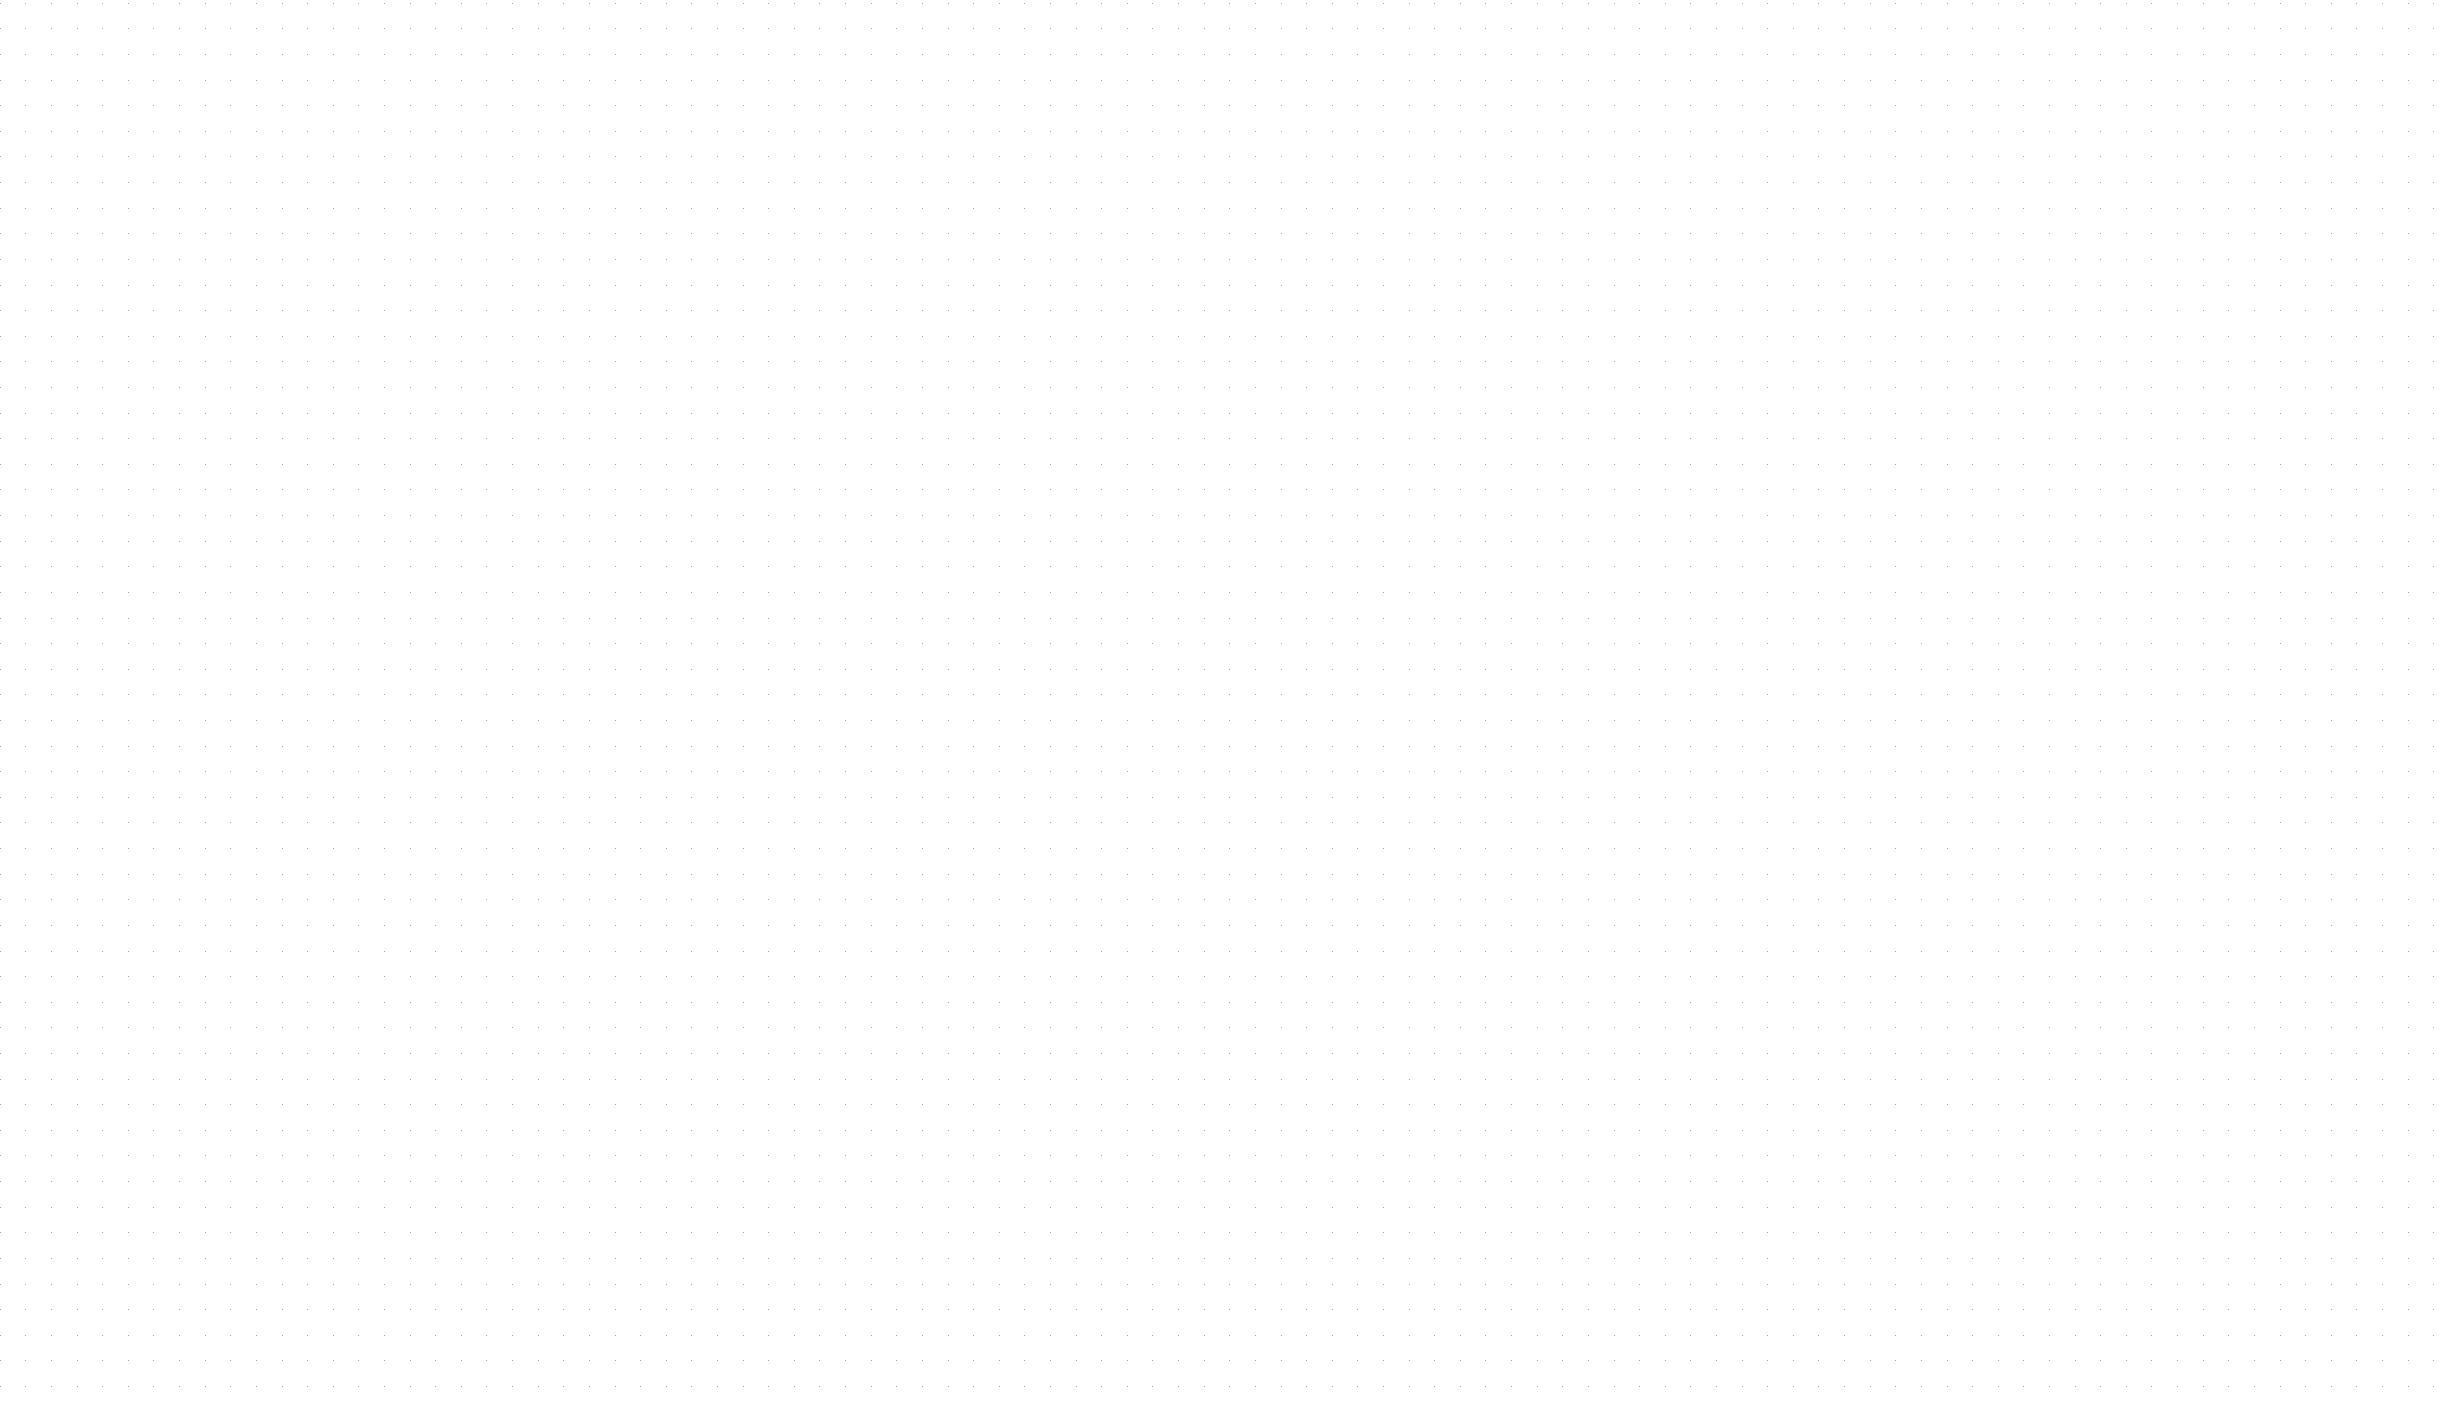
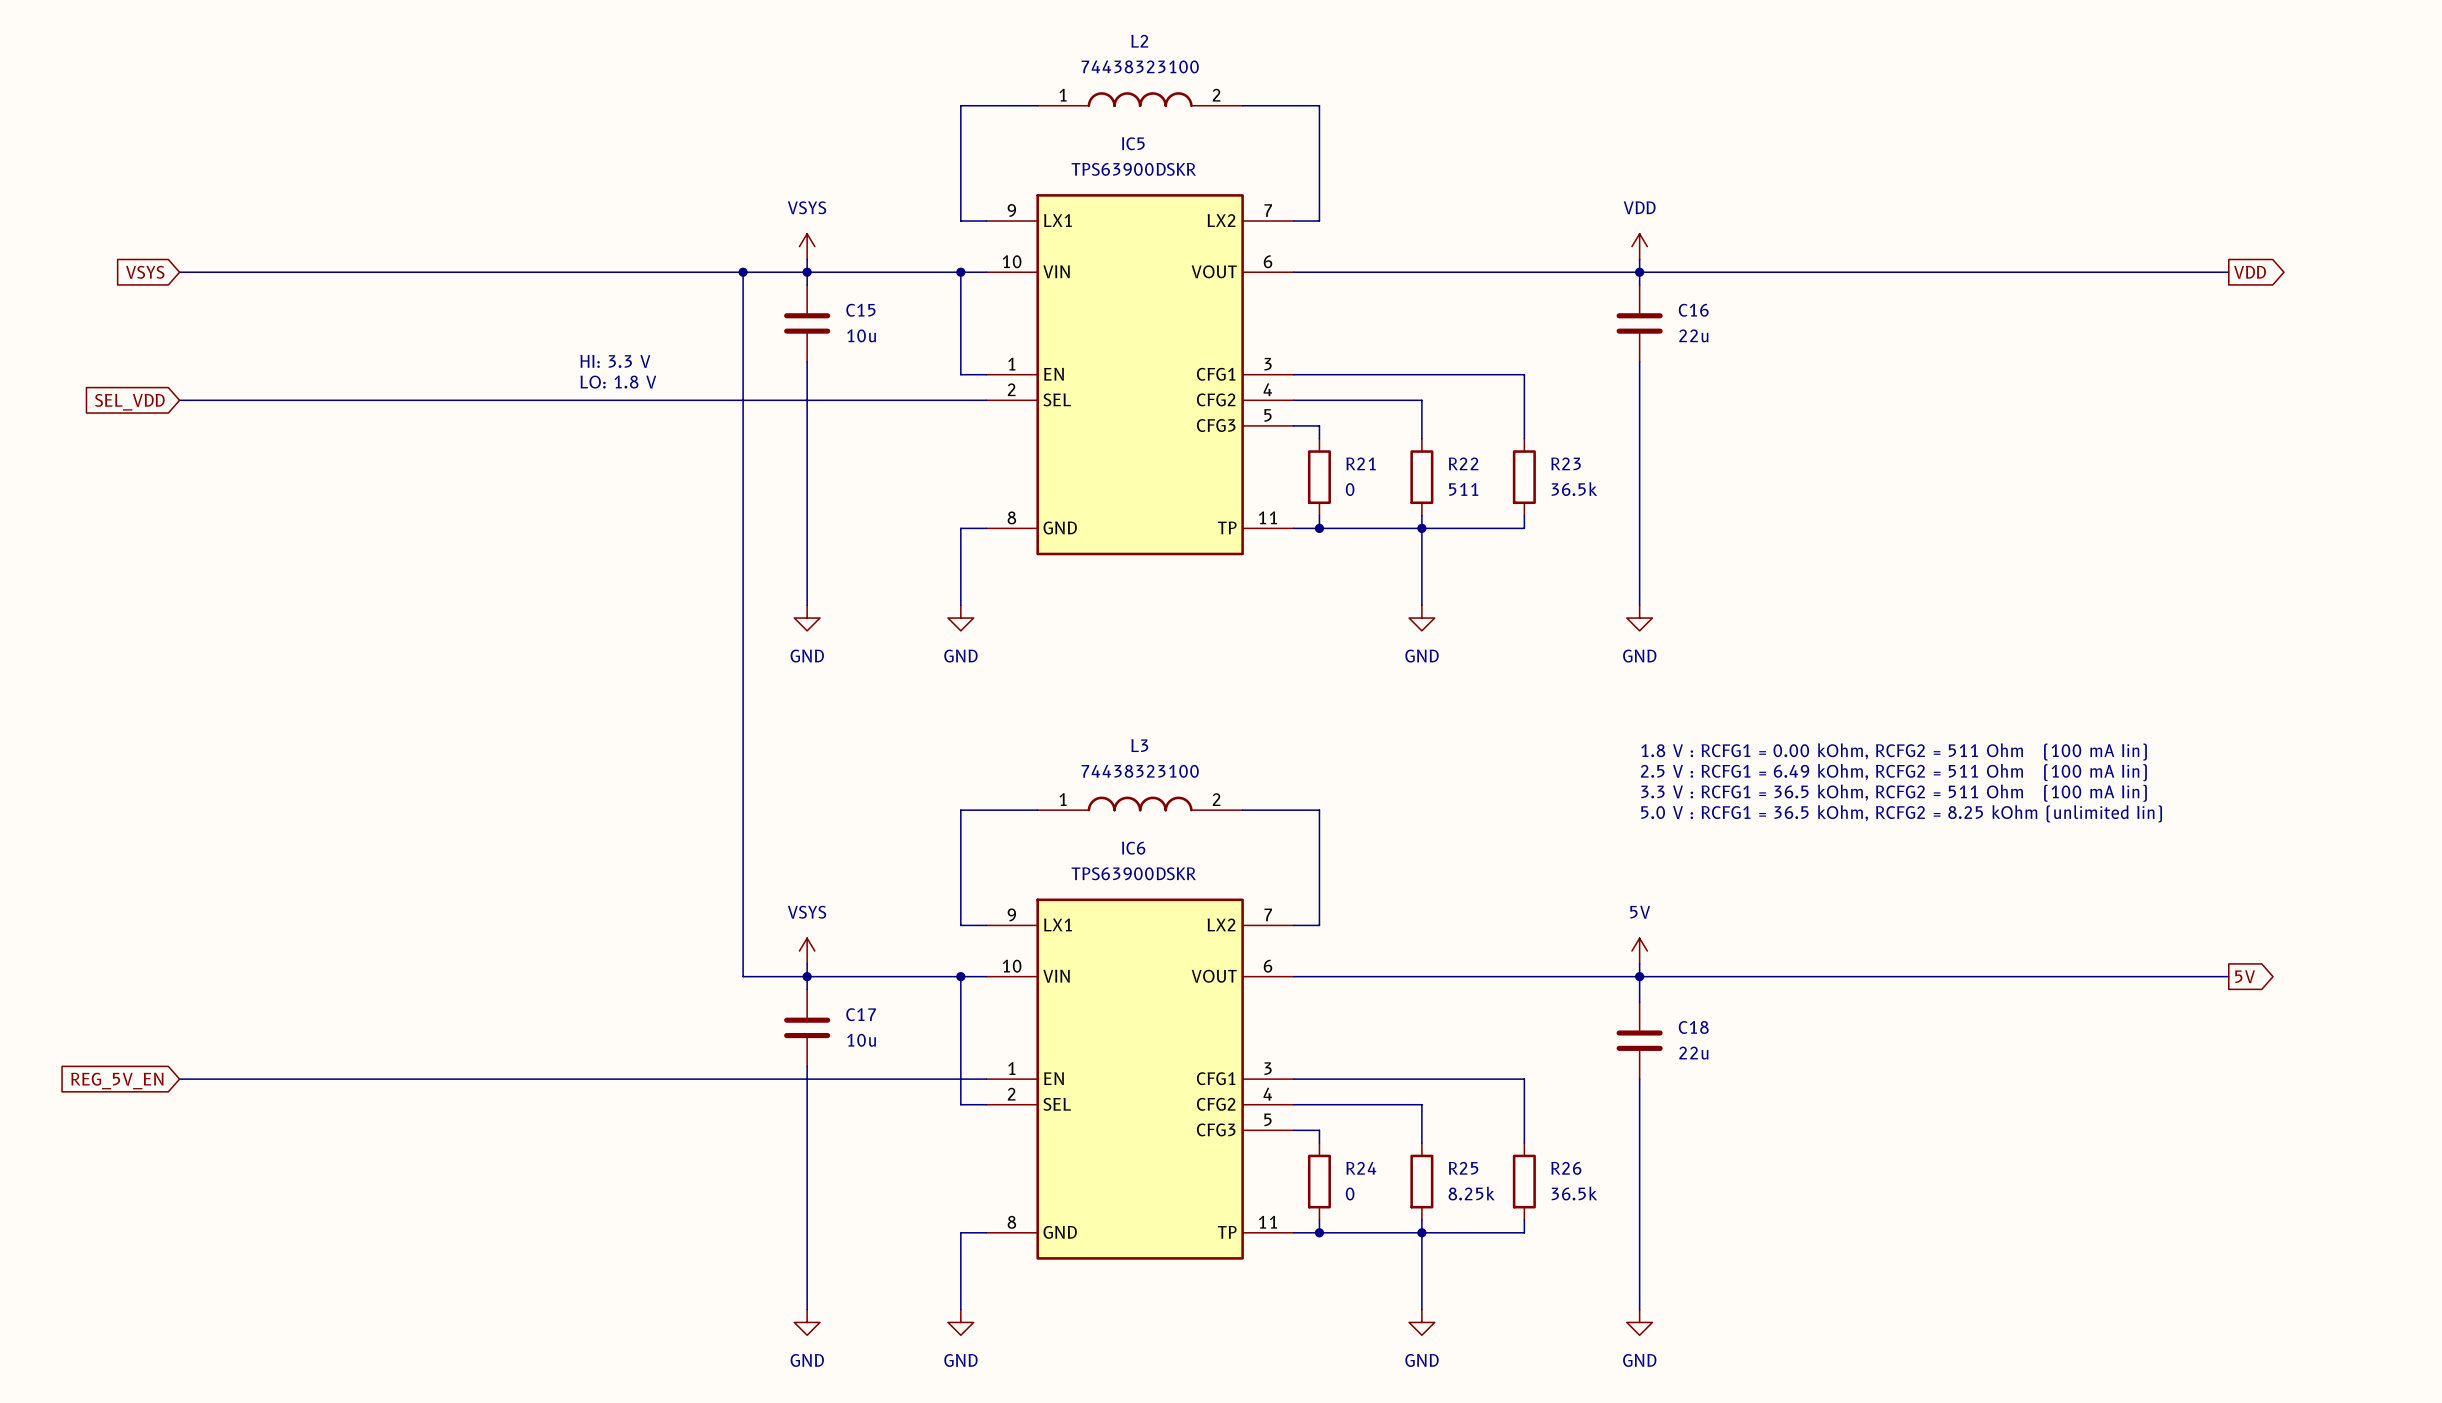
L2: none -> 74438323100 (1140, 99)
wire: none -> (1037, 105) (960, 105) (960, 221) (986, 221)
wire: none -> (1242, 105) (1319, 105) (1319, 221) (1293, 221)
power symbol: none -> VSYS (807, 246)
power symbol: none -> VDD (1639, 246)
wire: none -> (807, 259) (807, 285)
wire: none -> (1639, 259) (1639, 285)
global label: none -> VSYS (145, 272)
wire: none -> (179, 272) (986, 272)
wire: none -> (743, 272) (743, 976) (986, 976)
junction: none -> (743, 272)
junction: none -> (807, 272)
wire: none -> (960, 272) (960, 374) (986, 374)
junction: none -> (960, 272)
wire: none -> (1293, 272) (2228, 272)
junction: none -> (1639, 272)
global label: none -> VDD (2250, 272)
C15: none -> 10u (807, 323)
C16: none -> 22u (1639, 323)
text: none -> HI: 3.3 V (615, 361)
wire: none -> (807, 361) (807, 605)
wire: none -> (1639, 361) (1639, 605)
IC5: none -> TPS63900DSKR (1140, 374)
wire: none -> (1293, 374) (1524, 374) (1524, 438)
text: none -> LO: 1.8 V (618, 382)
wire: none -> (179, 400) (986, 400)
wire: none -> (1293, 400) (1421, 400) (1421, 438)
global label: none -> SEL_VDD (129, 402)
wire: none -> (1293, 425) (1319, 425) (1319, 438)
R21: none -> 0 (1319, 477)
R22: none -> 511 (1421, 477)
R23: none -> 36.5k (1524, 477)
wire: none -> (1319, 515) (1319, 528)
wire: none -> (1421, 515) (1421, 605)
wire: none -> (1524, 515) (1524, 528) (1293, 528)
wire: none -> (986, 528) (960, 528) (960, 605)
junction: none -> (1319, 528)
junction: none -> (1421, 528)
power symbol: none -> GND (807, 618)
power symbol: none -> GND (960, 618)
power symbol: none -> GND (1421, 618)
power symbol: none -> GND (1639, 618)
text: none -> 1.8 V : RCFG1 = 0.00 kOhm, RCFG2 = 511 Ohm (100 mA Iin) (1894, 751)
text: none -> 2.5 V : RCFG1 = 6.49 kOhm, RCFG2 = 511 Ohm (100 mA Iin) (1893, 772)
text: none -> 3.3 V : RCFG1 = 36.5 kOhm, RCFG2 = 511 Ohm (100 mA Iin) (1894, 793)
L3: none -> 74438323100 (1140, 804)
wire: none -> (1037, 810) (960, 810) (960, 925) (986, 925)
wire: none -> (1242, 810) (1319, 810) (1319, 925) (1293, 925)
text: none -> 5.0 V : RCFG1 = 36.5 kOhm, RCFG2 = 8.25 kOhm (unlimited Iin) (1901, 813)
power symbol: none -> VSYS (807, 951)
power symbol: none -> 5V (1639, 951)
wire: none -> (807, 963) (807, 989)
wire: none -> (1639, 963) (1639, 1002)
junction: none -> (807, 976)
wire: none -> (960, 976) (960, 1104) (986, 1104)
junction: none -> (960, 976)
wire: none -> (1293, 976) (2228, 976)
junction: none -> (1639, 976)
global label: none -> 5V (2245, 976)
C17: none -> 10u (807, 1027)
C18: none -> 22u (1639, 1040)
wire: none -> (807, 1066) (807, 1309)
wire: none -> (179, 1079) (986, 1079)
IC6: none -> TPS63900DSKR (1140, 1079)
wire: none -> (1293, 1079) (1524, 1079) (1524, 1143)
wire: none -> (1639, 1079) (1639, 1309)
global label: none -> REG_5V_EN (117, 1081)
wire: none -> (1293, 1104) (1421, 1104) (1421, 1143)
wire: none -> (1293, 1130) (1319, 1130) (1319, 1143)
R24: none -> 0 (1319, 1181)
R25: none -> 8.25k (1421, 1181)
R26: none -> 36.5k (1524, 1181)
wire: none -> (1319, 1219) (1319, 1232)
wire: none -> (1421, 1219) (1421, 1309)
wire: none -> (1524, 1219) (1524, 1232) (1293, 1232)
wire: none -> (986, 1232) (960, 1232) (960, 1309)
junction: none -> (1319, 1232)
junction: none -> (1421, 1232)
power symbol: none -> GND (807, 1322)
power symbol: none -> GND (960, 1322)
power symbol: none -> GND (1421, 1322)
power symbol: none -> GND (1639, 1322)

